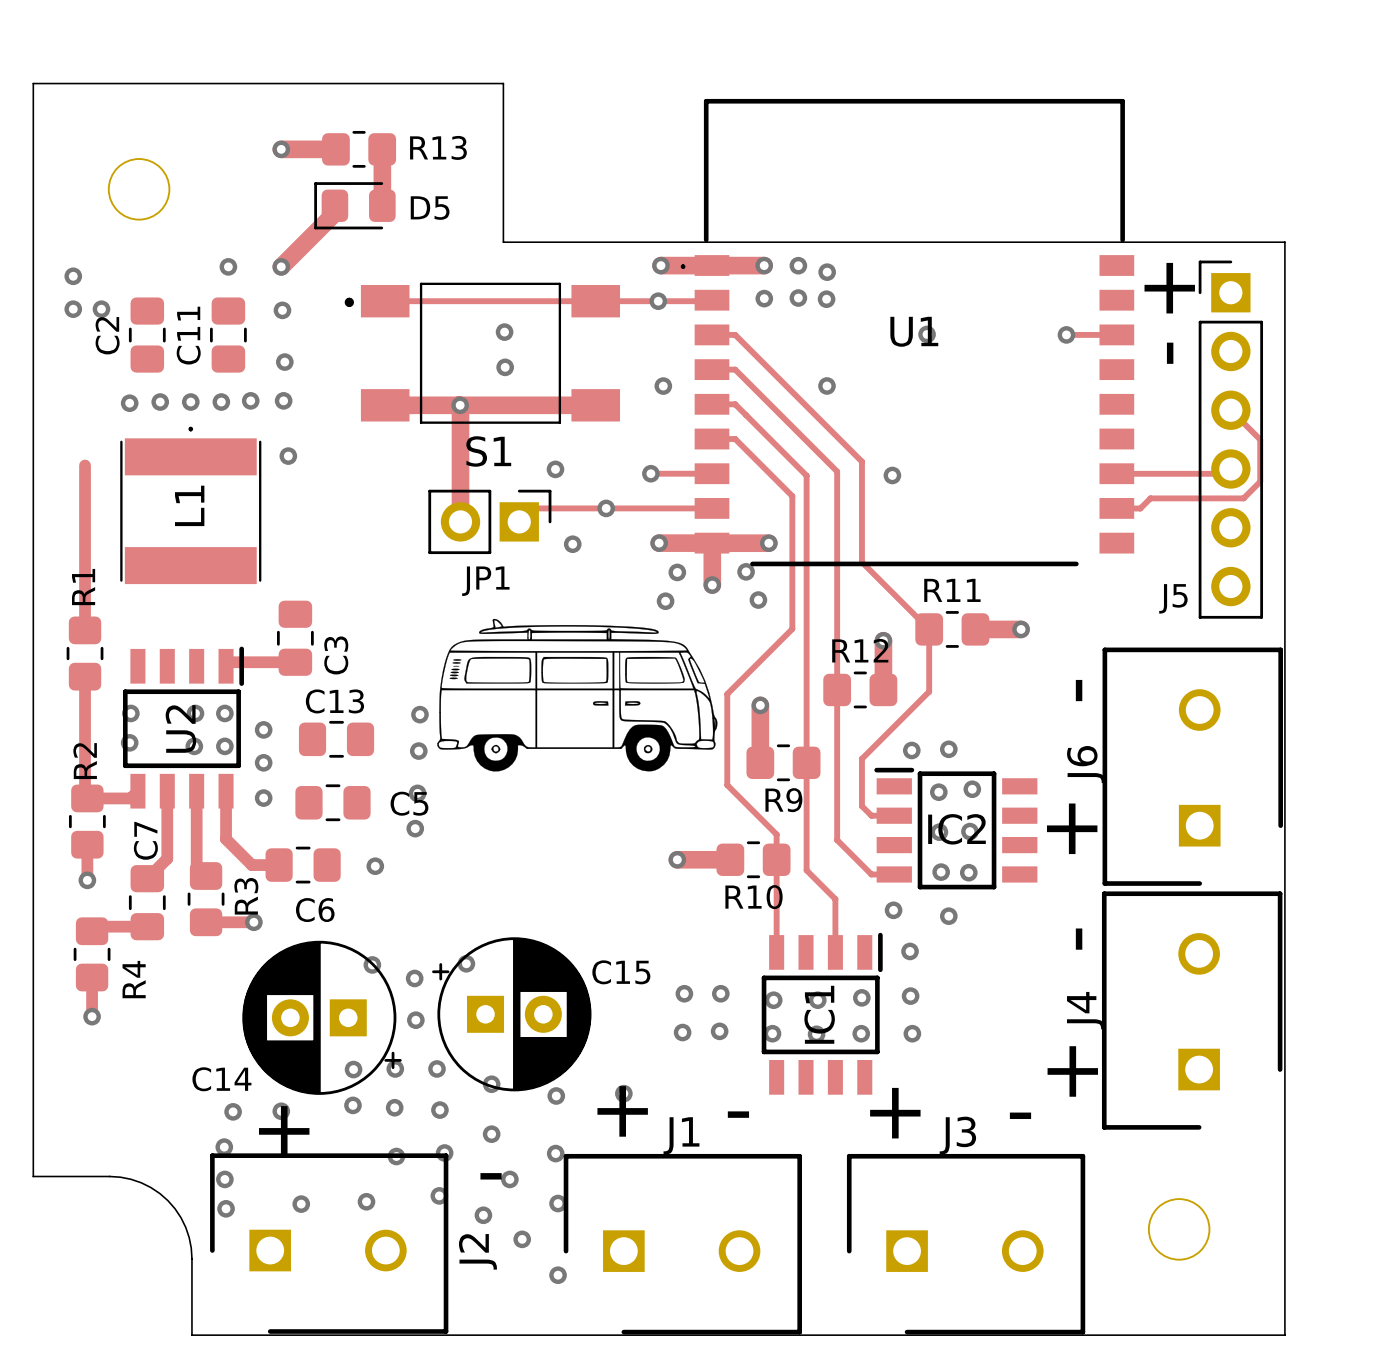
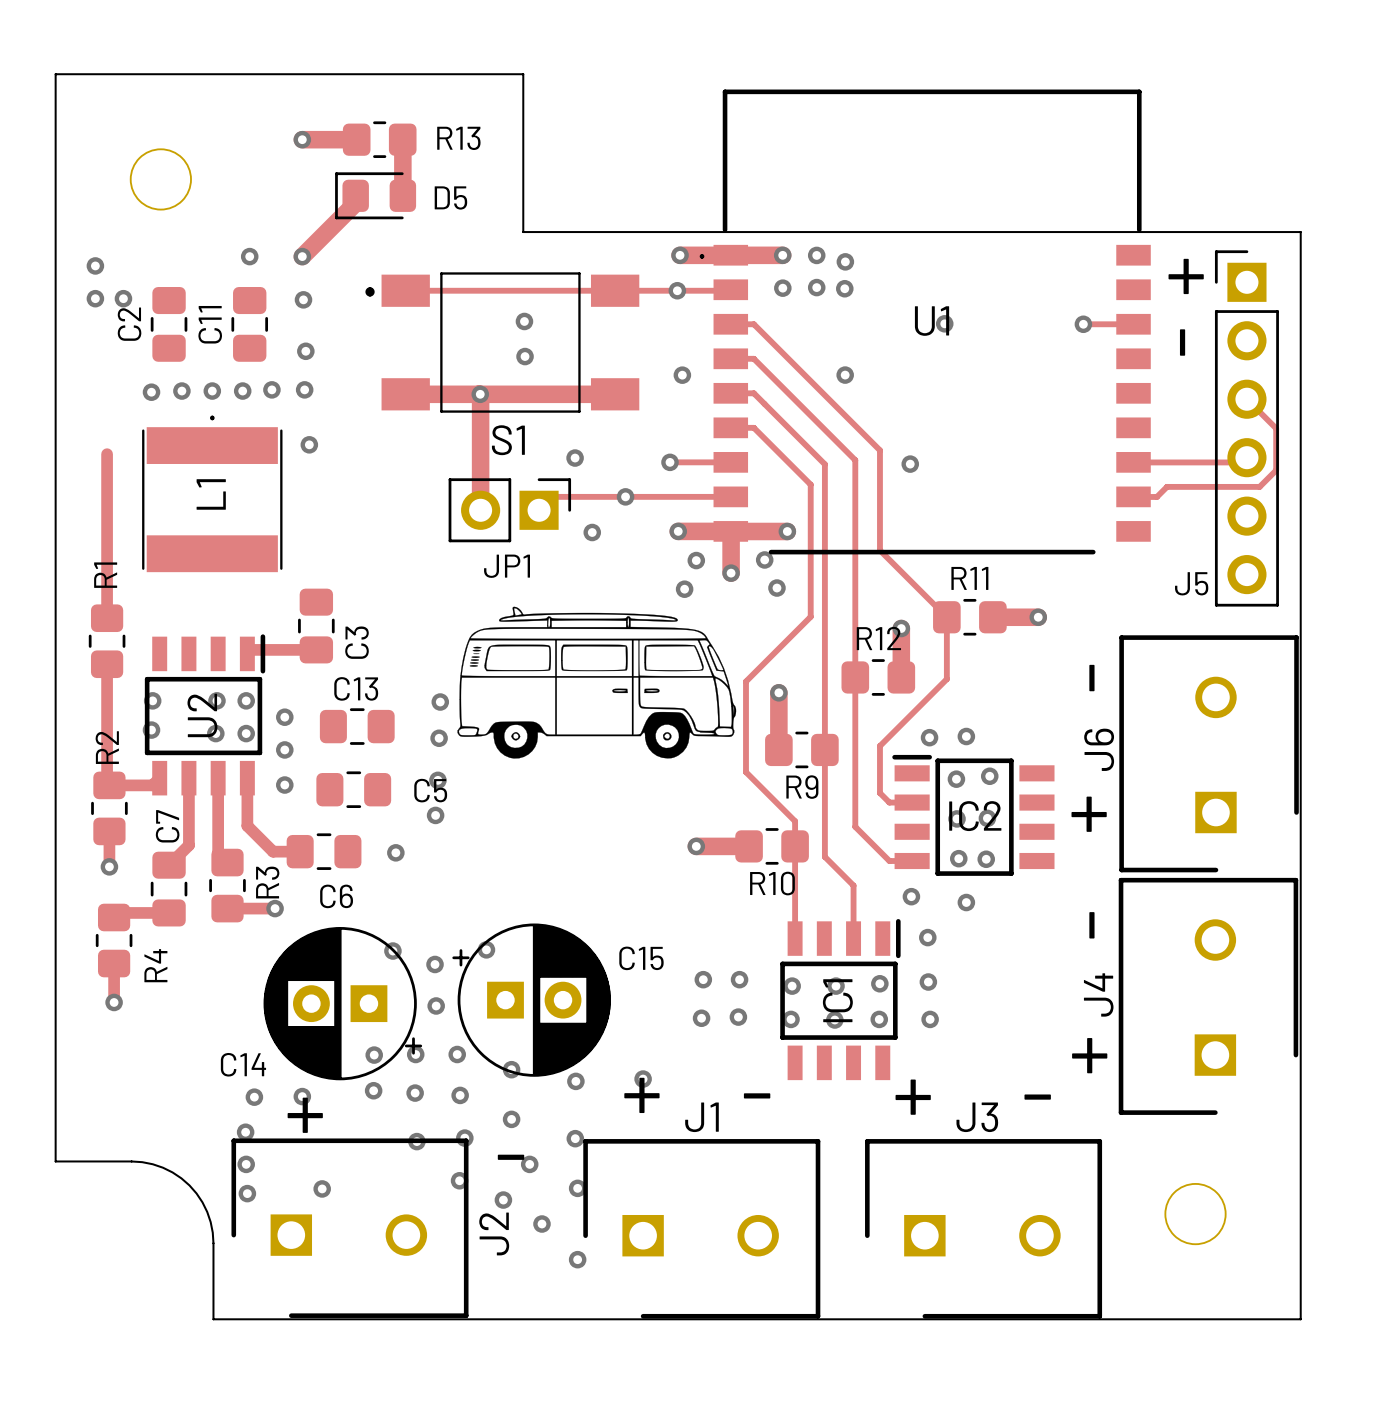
via: (366, 1201) -> none

